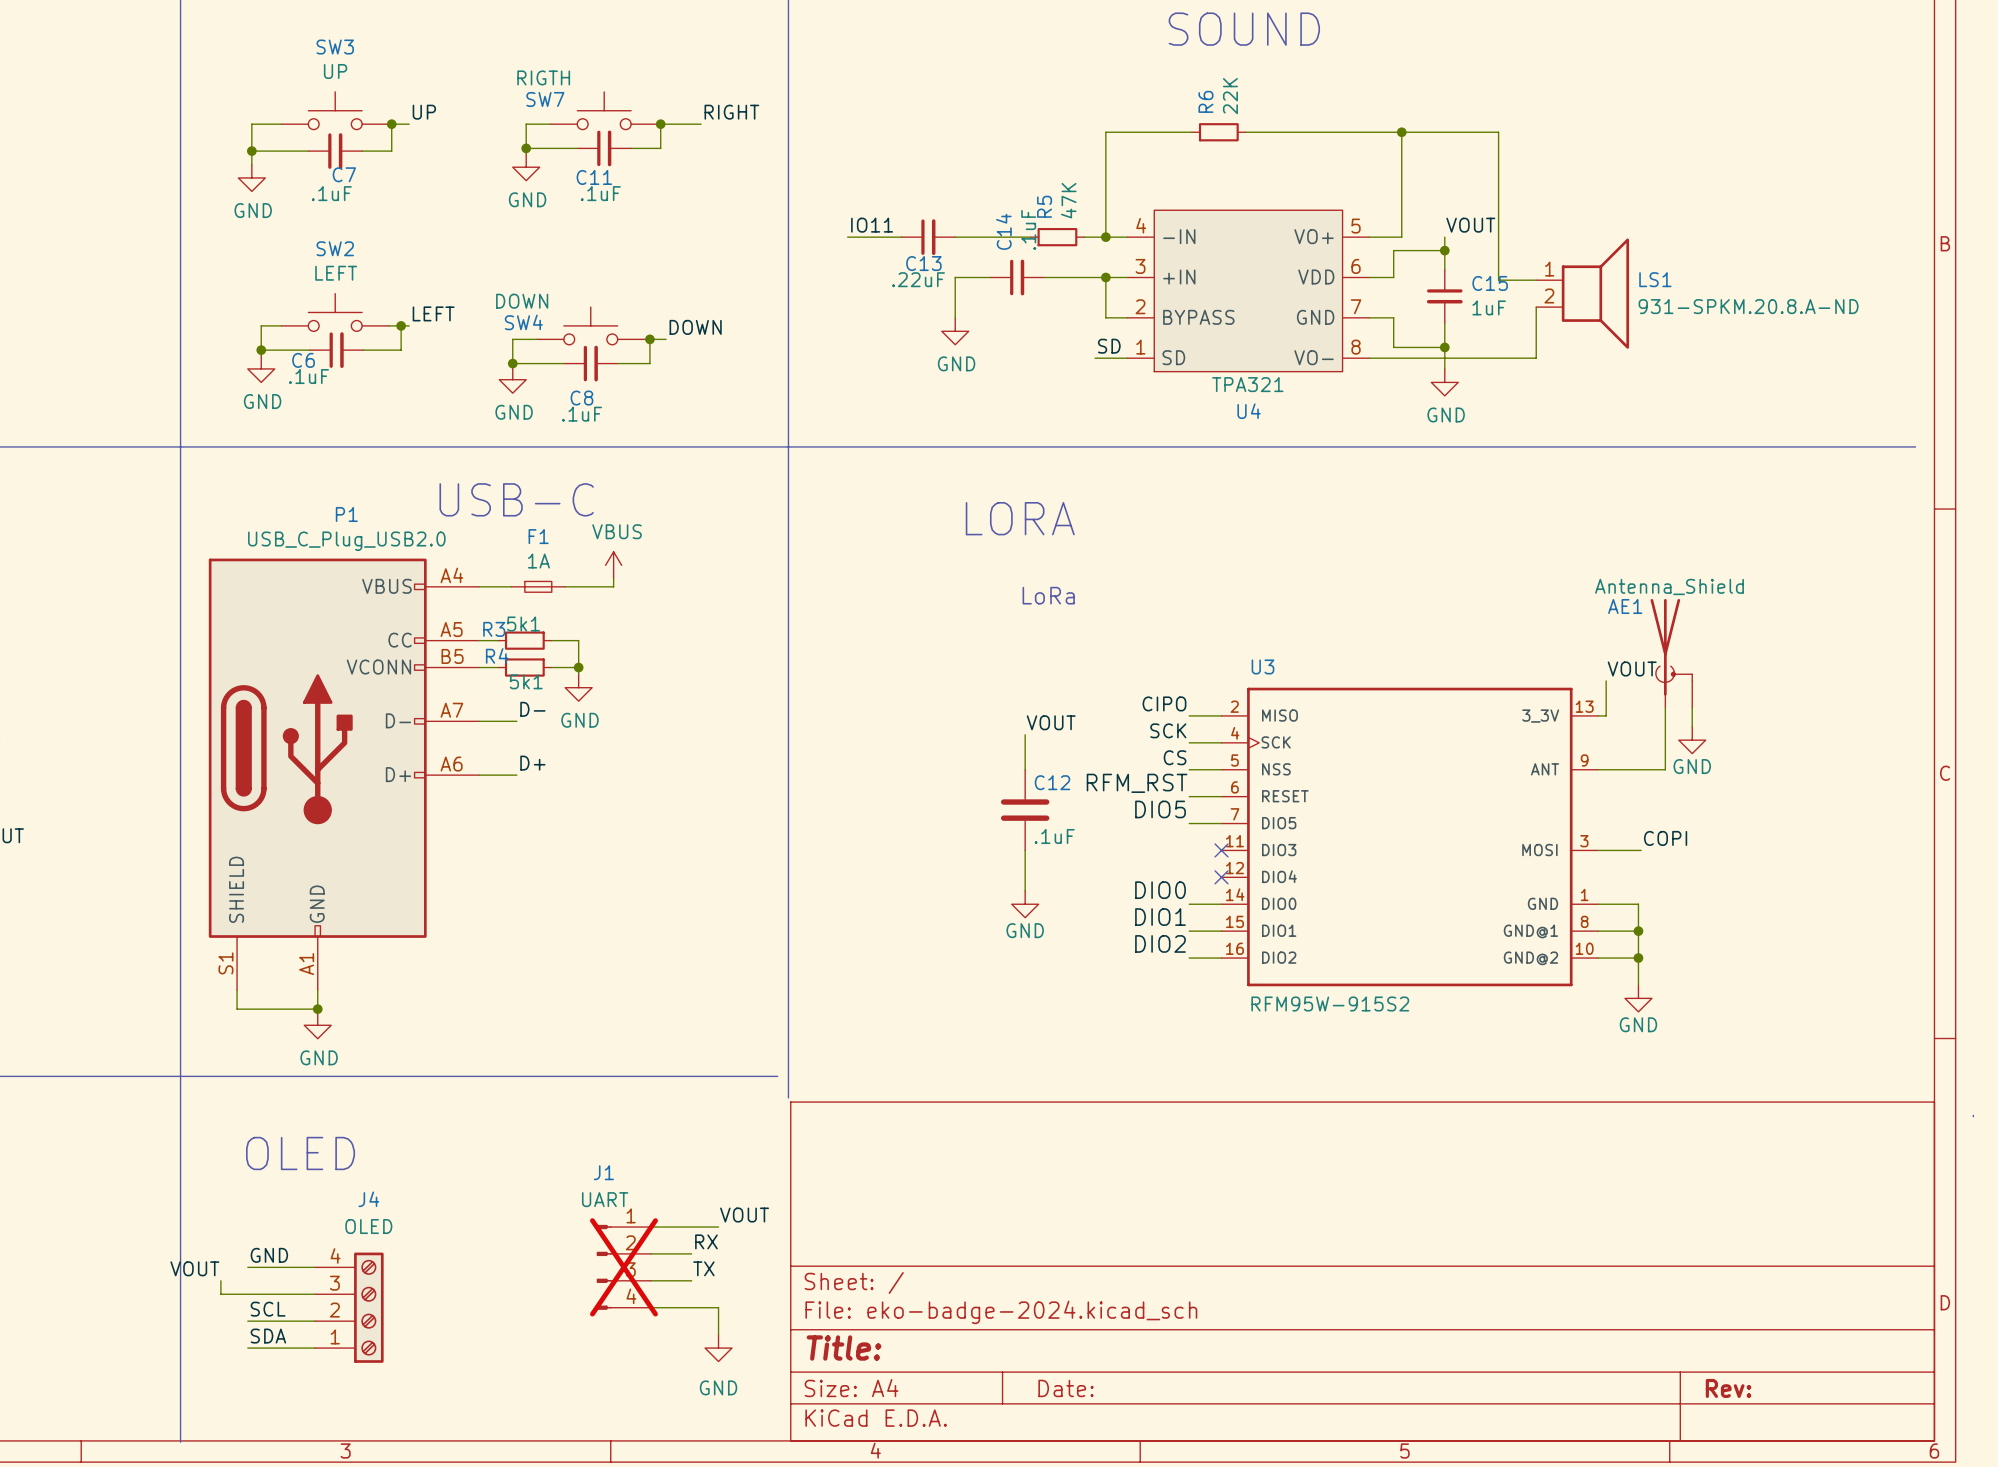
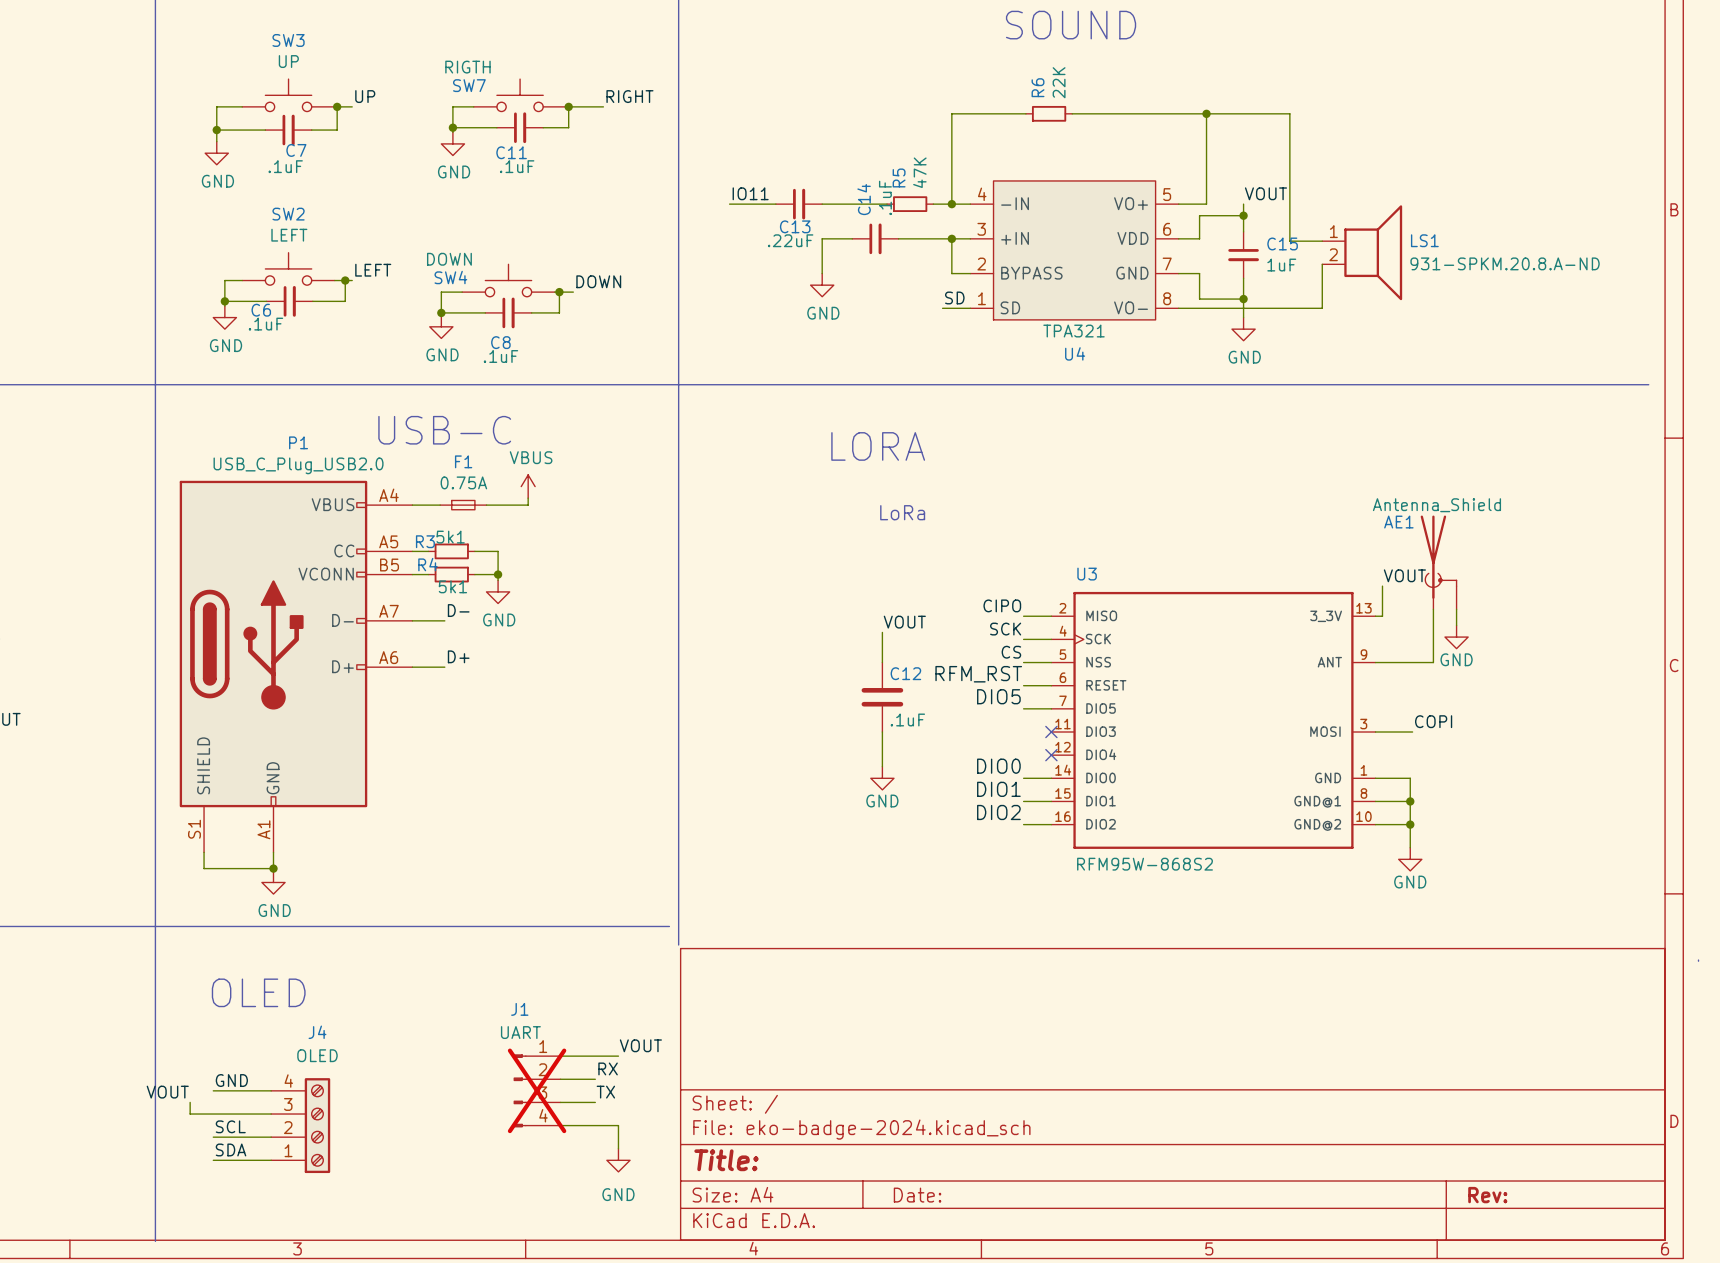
F1 value: 1A (538, 561) -> 0.75A (463, 482)
U3 value: RFM95W-915S2 (1330, 1003) -> RFM95W-868S2 (1145, 864)

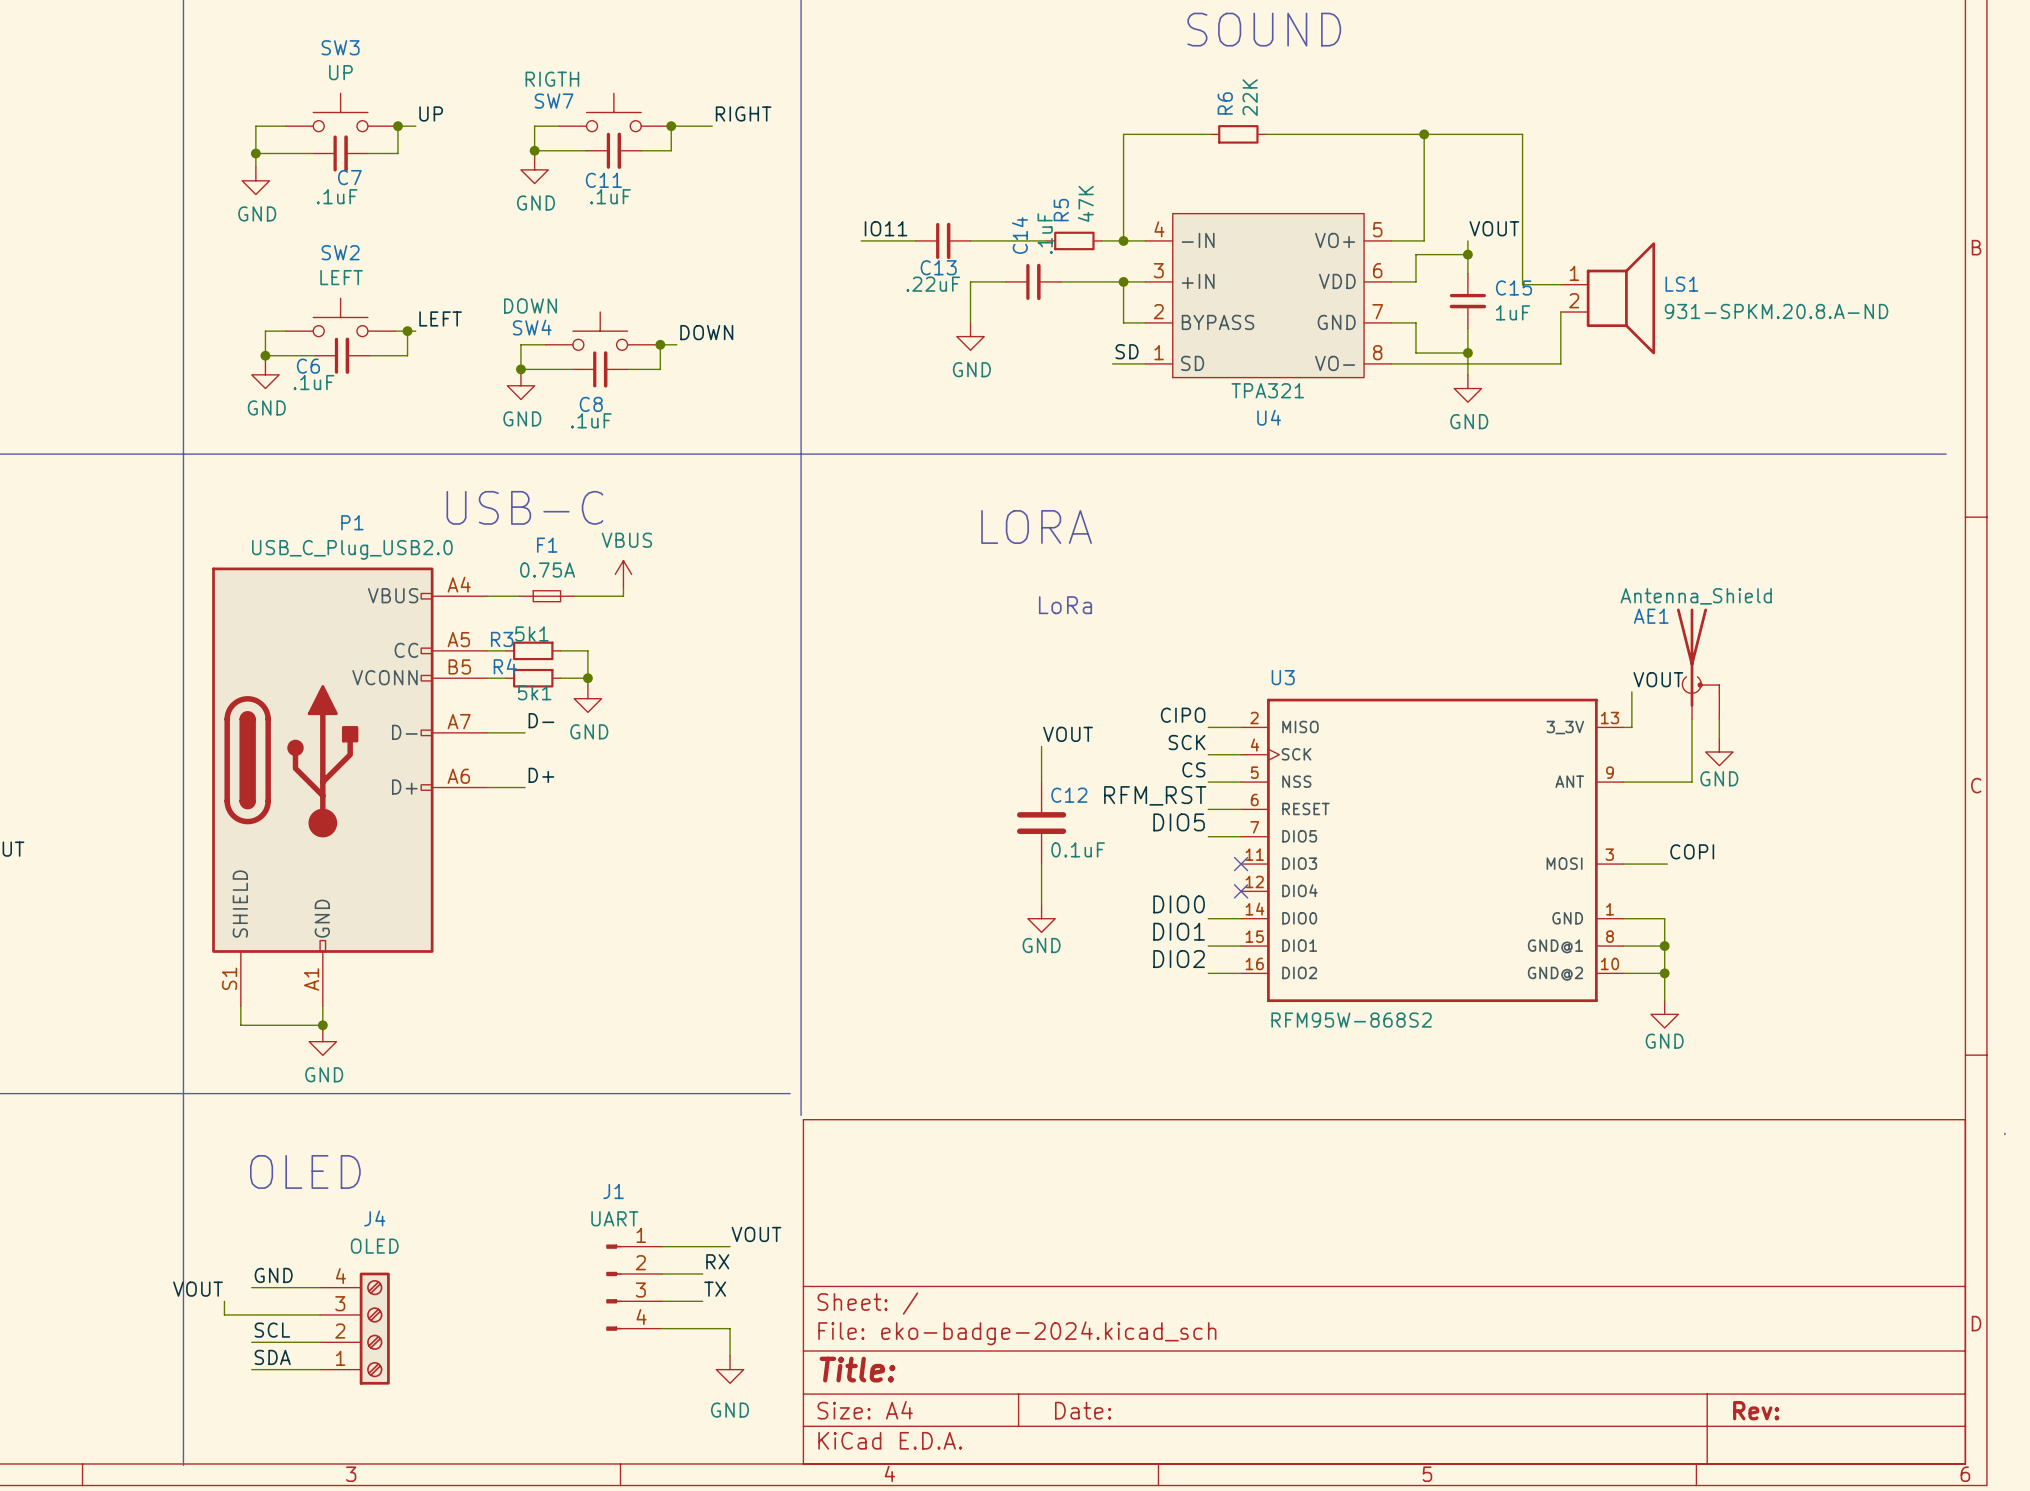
C12 value: .1uF (907, 719) -> 0.1uF (1078, 849)
J1 do-not-place cross: (537, 1090) -> none

